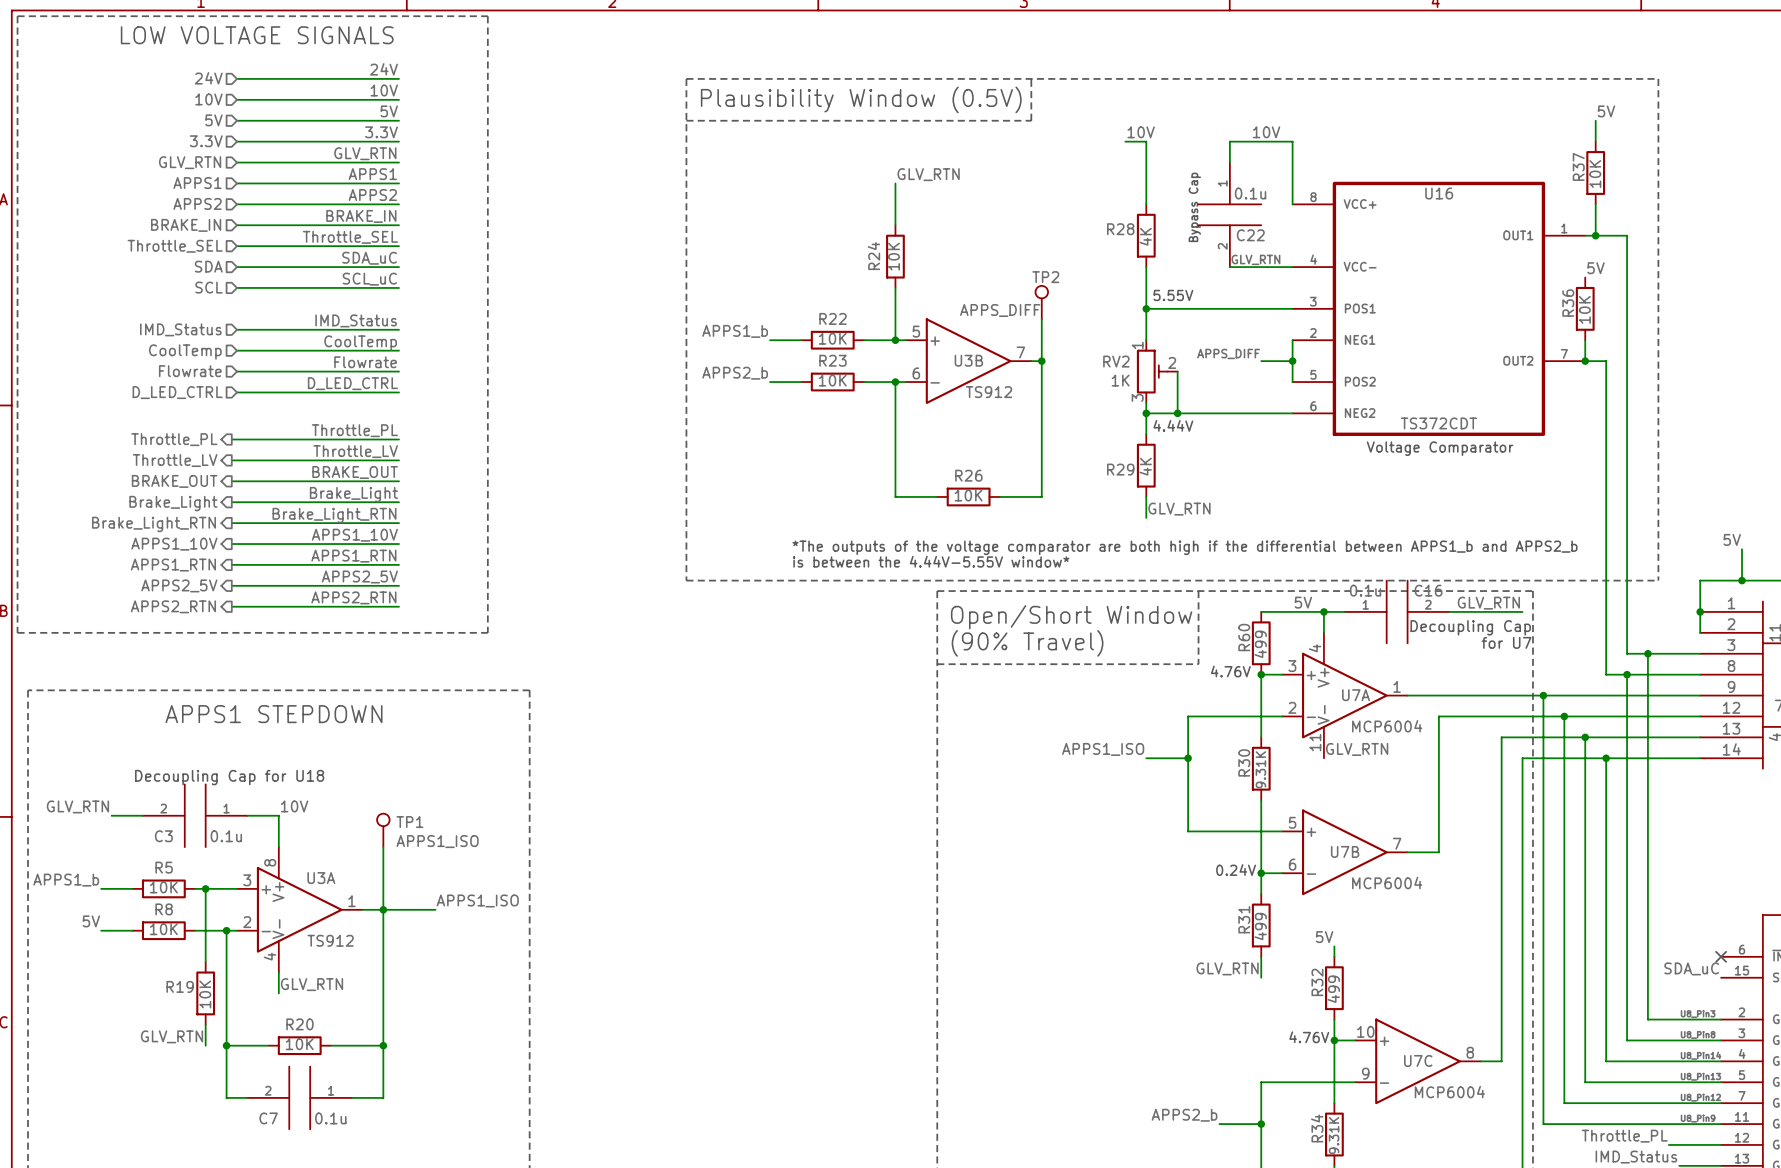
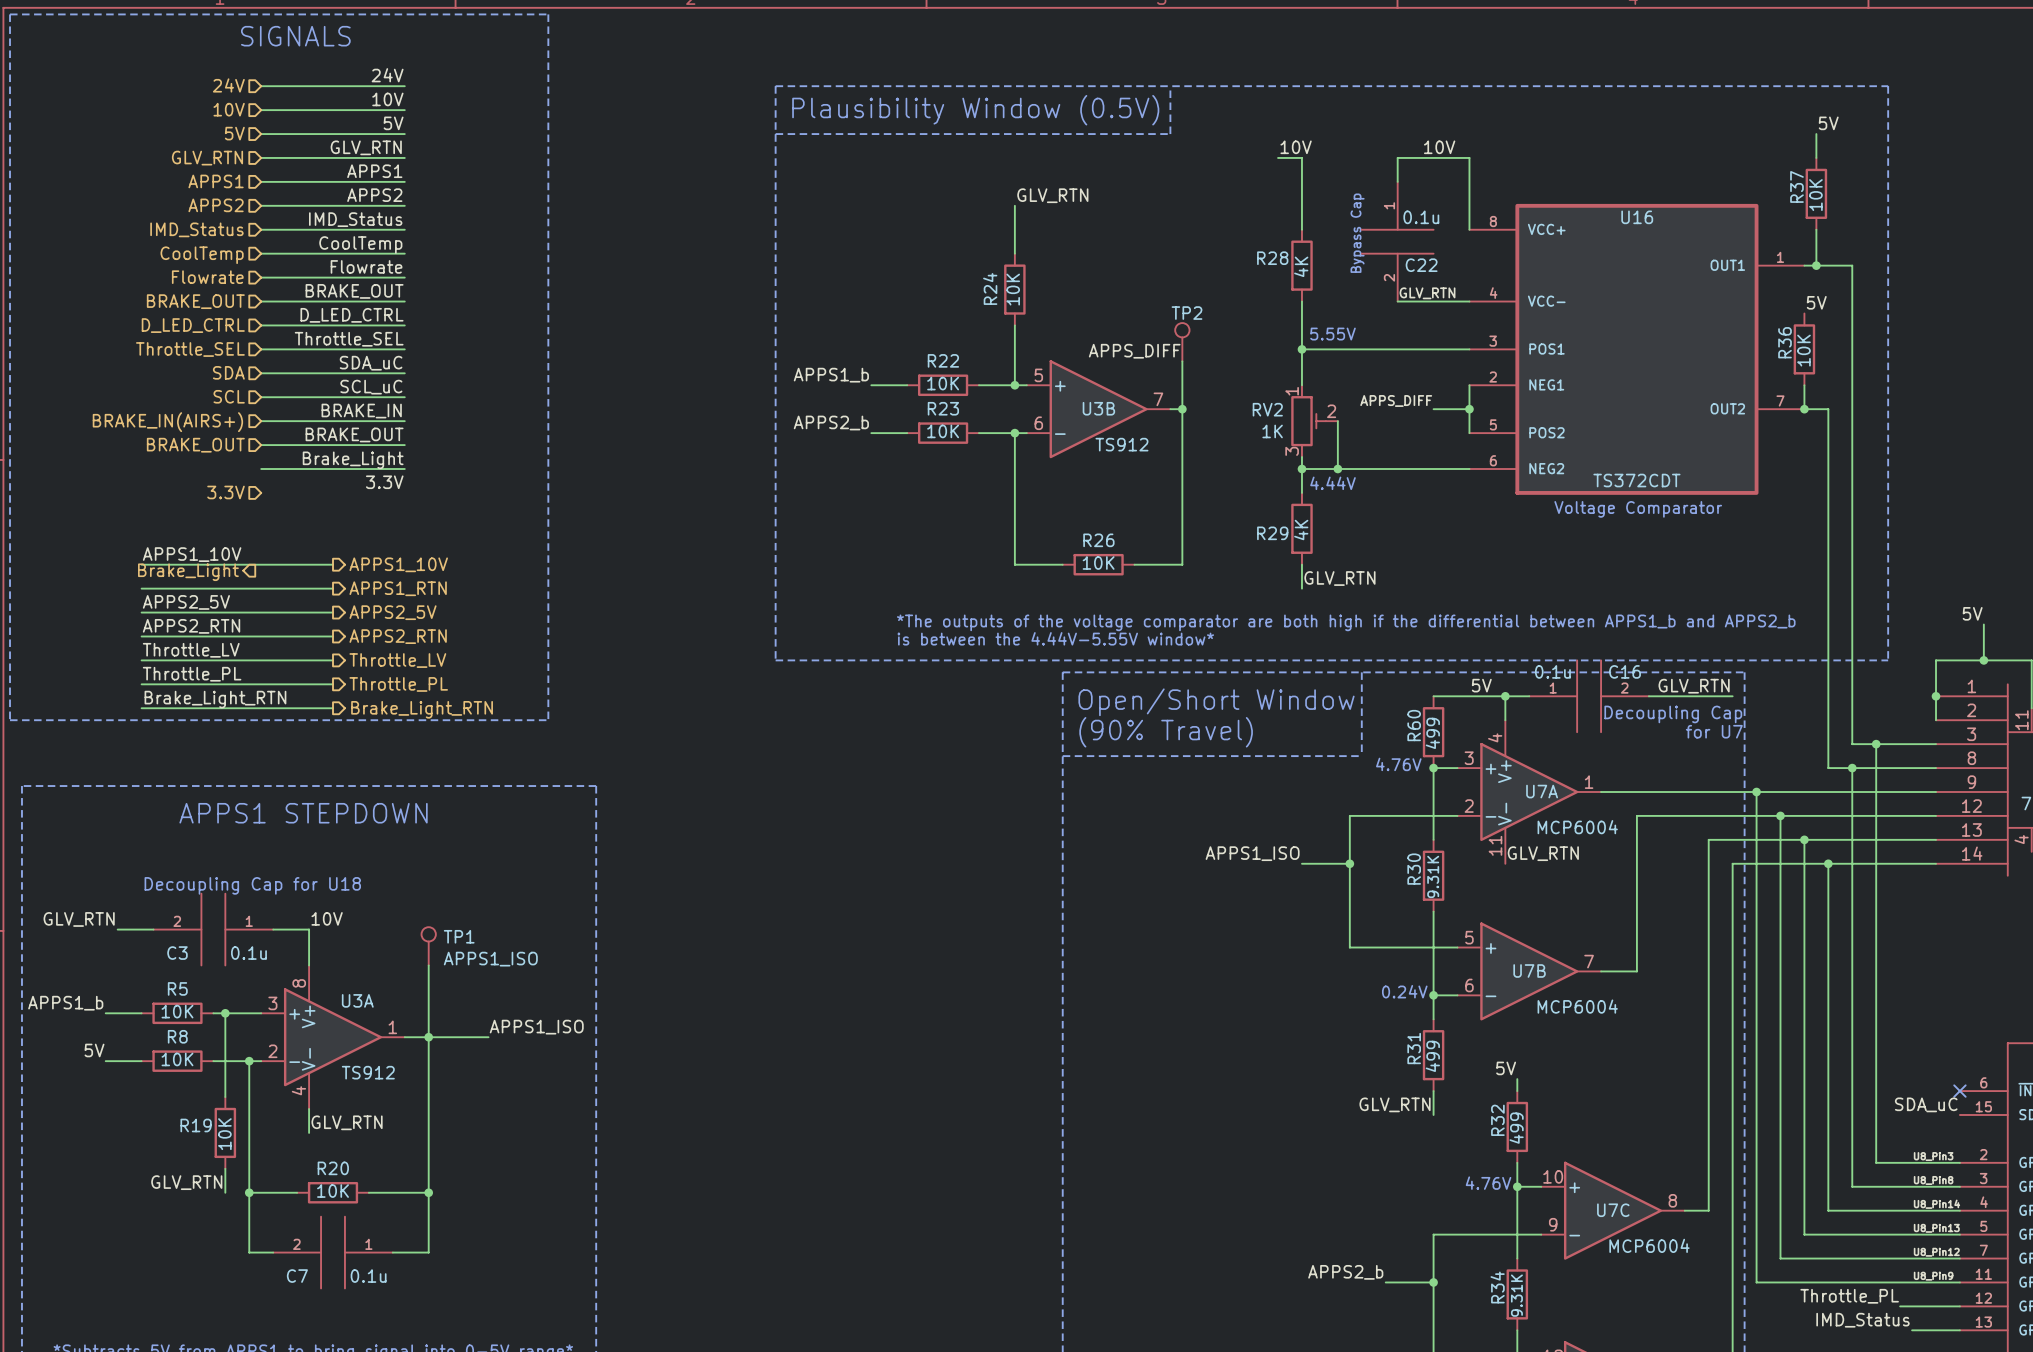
text: LOW VOLTAGE SIGNALS (257, 35) -> none
text: none -> SIGNALS (295, 36)
label position: 24V (384, 69) -> 24V (387, 75)
wire: (362, 78) (399, 78) -> none
label position: 10V (384, 90) -> 10V (387, 99)
wire: (362, 99) (399, 99) -> none
label position: 5V (389, 111) -> 5V (393, 123)
wire: (362, 120) (399, 120) -> none
label: 3.3V (381, 132) -> none
hierarchical label: 3.3V (206, 141) -> GLV_RTN (207, 158)
wire: (362, 141) (399, 141) -> none
label position: GLV_RTN (365, 153) -> GLV_RTN (366, 147)
hierarchical label: GLV_RTN (190, 162) -> APPS1 (216, 181)
wire: (362, 162) (399, 162) -> none
label position: APPS1 (372, 174) -> APPS1 (374, 171)
hierarchical label: APPS1 (197, 183) -> APPS2 (216, 205)
wire: (362, 183) (399, 183) -> none
label position: APPS2 (372, 195) -> APPS2 (374, 195)
hierarchical label: APPS2 (197, 203) -> IMD_Status (196, 229)
wire: (362, 204) (399, 204) -> none
label position: BRAKE_IN (361, 216) -> BRAKE_IN (361, 411)
hierarchical label: BRAKE_IN (186, 225) -> CoolTemp (202, 255)
wire: (362, 225) (399, 225) -> none
label position: Throttle_SEL (350, 237) -> Throttle_SEL (349, 339)
hierarchical label: Throttle_SEL (175, 246) -> Flowrate (207, 277)
wire: (362, 246) (399, 246) -> none
label: none -> BRAKE_OUT (354, 291)
label position: SDA_uC (369, 258) -> SDA_uC (371, 363)
hierarchical label: SDA (208, 266) -> BRAKE_OUT (195, 301)
wire: (362, 267) (399, 267) -> none
label position: SCL_uC (369, 279) -> SCL_uC (371, 387)
hierarchical label: SCL (208, 287) -> D_LED_CTRL (193, 325)
wire: (362, 287) (399, 287) -> none
hierarchical label: none -> Throttle_SEL (190, 349)
wire: none -> (261, 349) (404, 349)
label position: IMD_Status (356, 320) -> IMD_Status (355, 219)
hierarchical label: IMD_Status (180, 329) -> SDA (228, 372)
wire: (362, 329) (399, 329) -> none
label position: CoolTemp (360, 343) -> CoolTemp (360, 244)
wire: (362, 350) (399, 350) -> none
hierarchical label: CoolTemp (185, 352) -> SCL (229, 396)
label position: Flowrate (365, 362) -> Flowrate (366, 266)
hierarchical label: Flowrate (190, 371) -> BRAKE_IN(AIRS+) (167, 422)
wire: (362, 371) (399, 371) -> none
label position: D_LED_CTRL (352, 383) -> D_LED_CTRL (352, 315)
hierarchical label: D_LED_CTRL (177, 392) -> BRAKE_OUT (195, 445)
wire: (362, 392) (399, 392) -> none
wire: none -> (261, 469) (404, 469)
label: none -> 3.3V (384, 482)
label: Throttle_PL (354, 430) -> none
hierarchical label: none -> 3.3V (226, 492)
hierarchical label rotation: 0° (174, 439) -> 180° (398, 684)
hierarchical label position: Throttle_PL (174, 439) -> Throttle_PL (398, 684)
wire: (231, 439) (399, 439) -> none
label: Throttle_LV (355, 451) -> none
hierarchical label rotation: 0° (175, 460) -> 180° (397, 660)
hierarchical label position: Throttle_LV (175, 460) -> Throttle_LV (397, 660)
wire: (231, 460) (399, 460) -> none
label position: BRAKE_OUT (355, 472) -> BRAKE_OUT (354, 434)
hierarchical label: BRAKE_OUT (174, 481) -> none
wire: (231, 481) (399, 481) -> (141, 564) (333, 564)
label: none -> APPS1_10V (192, 554)
label position: Brake_Light (353, 494) -> Brake_Light (353, 460)
wire: (231, 502) (399, 502) -> (141, 588) (333, 588)
label: Brake_Light_RTN (334, 515) -> none
wire: (231, 523) (399, 523) -> (141, 612) (333, 612)
hierarchical label rotation: 0° (153, 524) -> 180° (422, 709)
hierarchical label position: Brake_Light_RTN (153, 524) -> Brake_Light_RTN (422, 709)
label: none -> APPS2_5V (186, 602)
label: APPS1_10V (354, 535) -> none
hierarchical label rotation: 0° (174, 544) -> 180° (398, 564)
hierarchical label position: APPS1_10V (174, 544) -> APPS1_10V (398, 564)
wire: (231, 544) (399, 544) -> (141, 636) (333, 636)
label: none -> APPS2_RTN (191, 626)
label: APPS1_RTN (353, 556) -> none
wire: (231, 564) (399, 564) -> (141, 660) (333, 660)
hierarchical label rotation: 0° (173, 565) -> 180° (398, 588)
hierarchical label position: APPS1_RTN (173, 565) -> APPS1_RTN (398, 588)
label: none -> Throttle_LV (191, 650)
label: APPS2_5V (359, 576) -> none
hierarchical label rotation: 0° (179, 585) -> 180° (393, 612)
hierarchical label position: APPS2_5V (179, 585) -> APPS2_5V (393, 612)
wire: (231, 585) (399, 585) -> (141, 684) (333, 684)
label: none -> Throttle_PL (192, 674)
label: APPS2_RTN (353, 597) -> none
hierarchical label rotation: 0° (173, 606) -> 180° (398, 636)
hierarchical label position: APPS2_RTN (173, 606) -> APPS2_RTN (398, 636)
wire: (231, 606) (399, 606) -> (141, 708) (333, 708)
label: none -> Brake_Light_RTN (215, 699)

